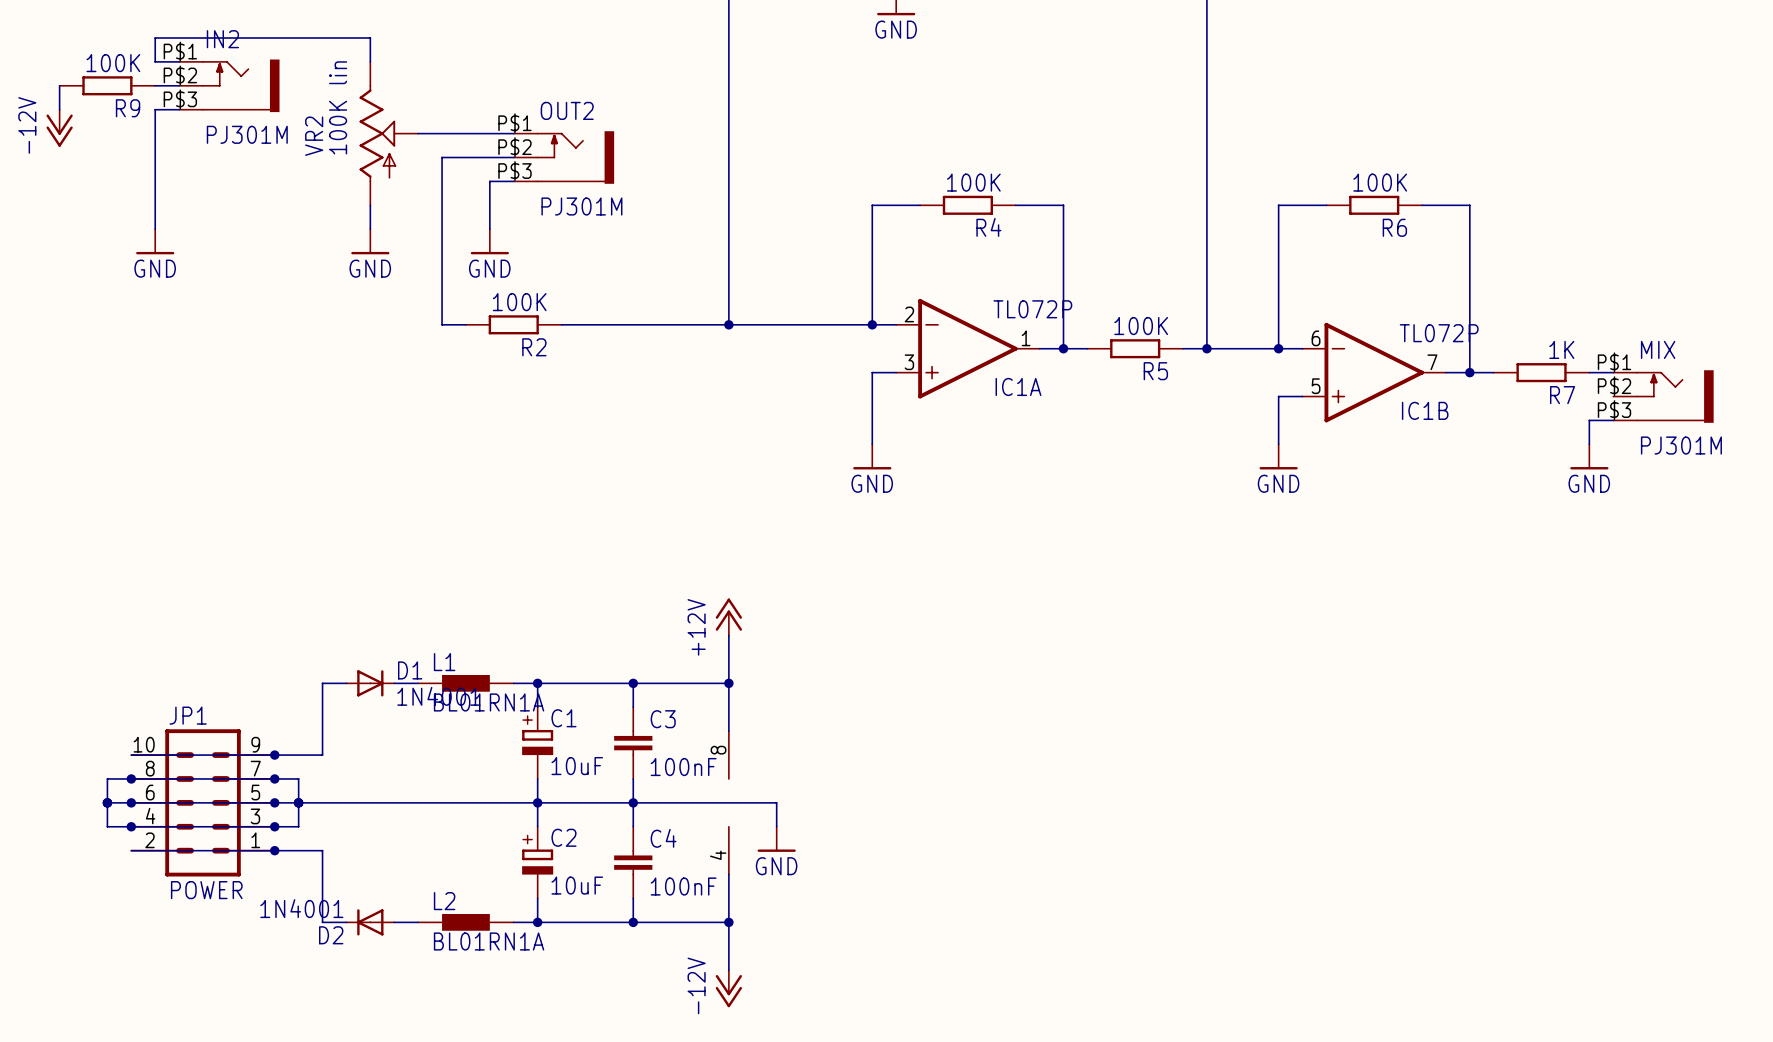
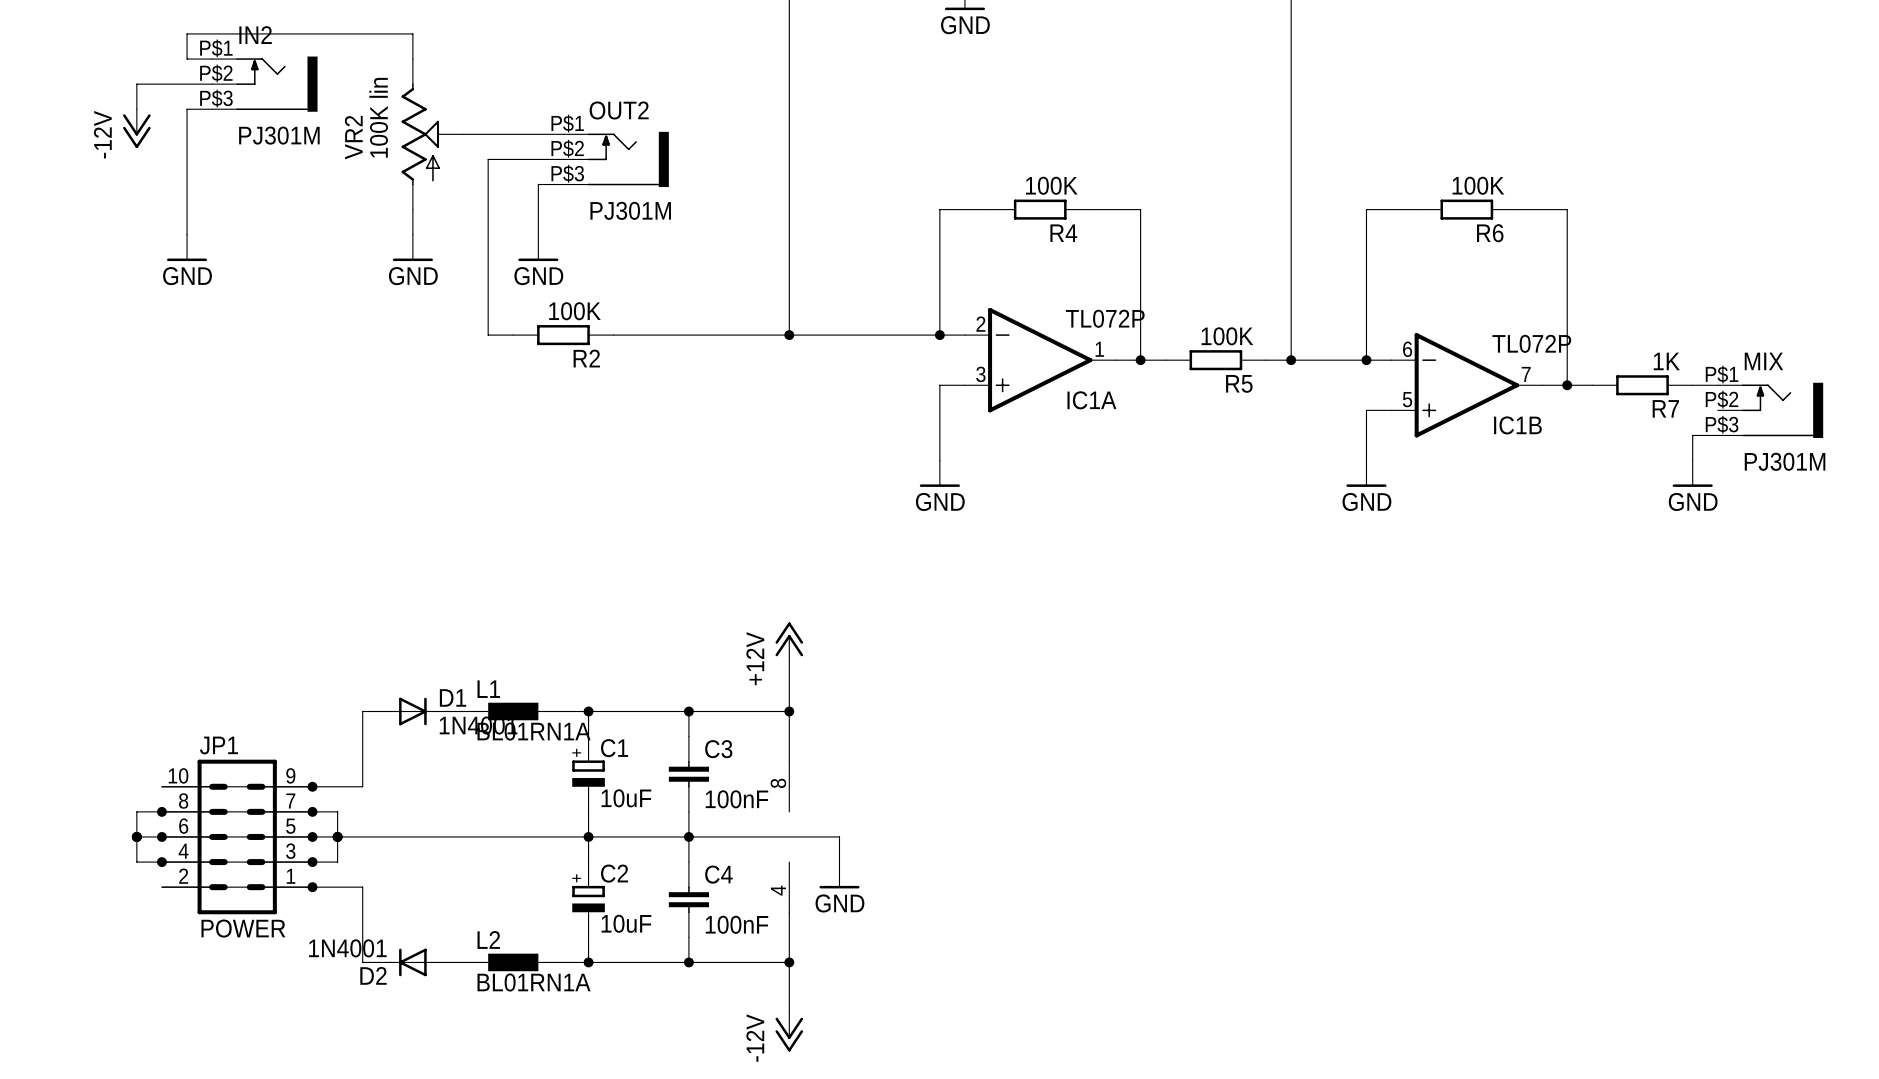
wire: (59, 85) (59, 109) -> none
R9: 100K (107, 85) -> none
wire: none -> (187, 84) (136, 84) (136, 109)
power symbol position: -12V (59, 128) -> -12V (136, 128)

